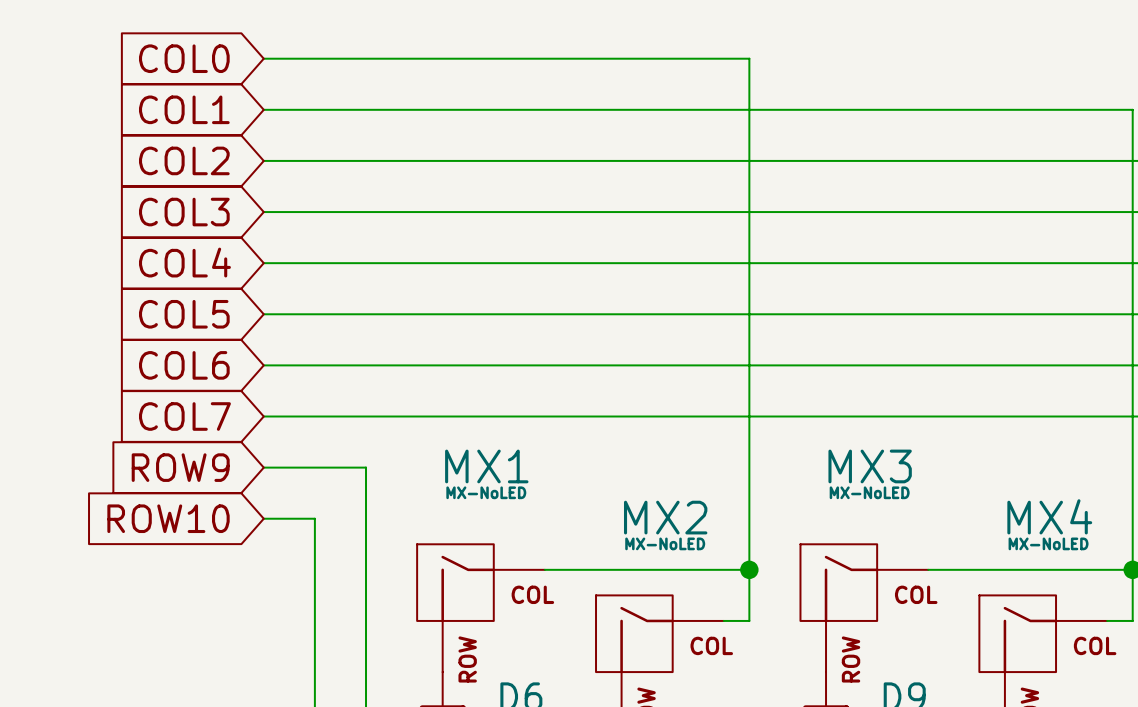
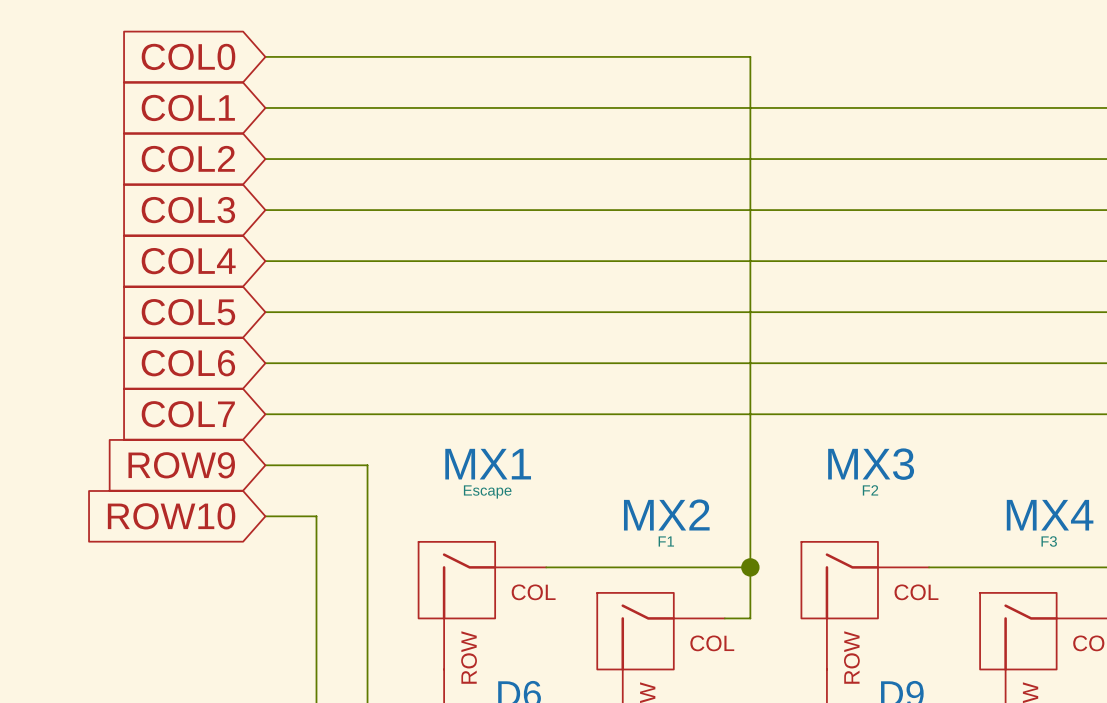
MX1 value: MX-NoLED (486, 492) -> Escape (487, 491)
MX3 value: MX-NoLED (869, 492) -> F2 (870, 490)
MX2 value: MX-NoLED (665, 543) -> F1 (666, 541)
MX4 value: MX-NoLED (1048, 543) -> F3 (1049, 541)

